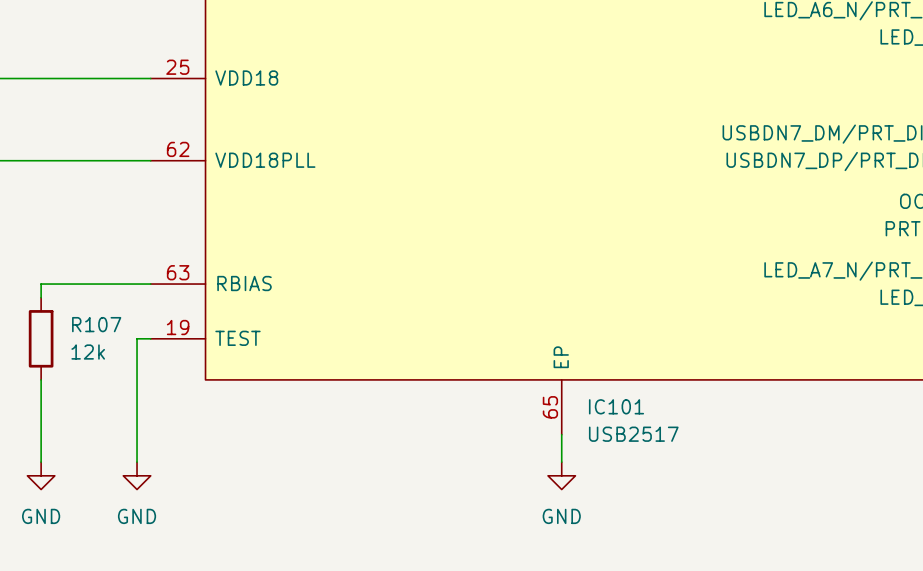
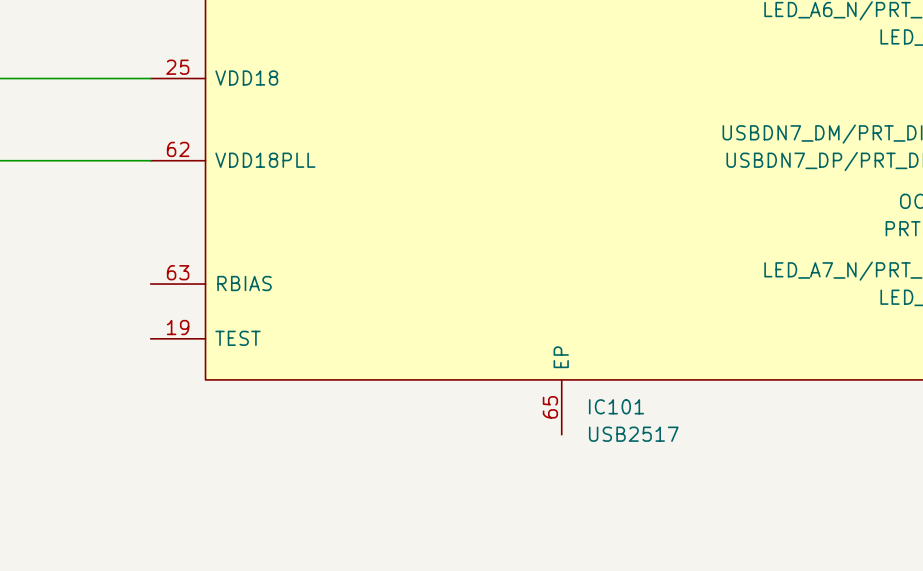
wire: (150, 284) (41, 284) (41, 297) -> none
R107: 12k (41, 338) -> none
wire: (150, 338) (137, 338) (137, 462) -> none
wire: (41, 379) (41, 462) -> none
wire: (561, 434) (561, 462) -> none
power symbol: GND (41, 475) -> none
power symbol: GND (137, 475) -> none
power symbol: GND (561, 475) -> none

